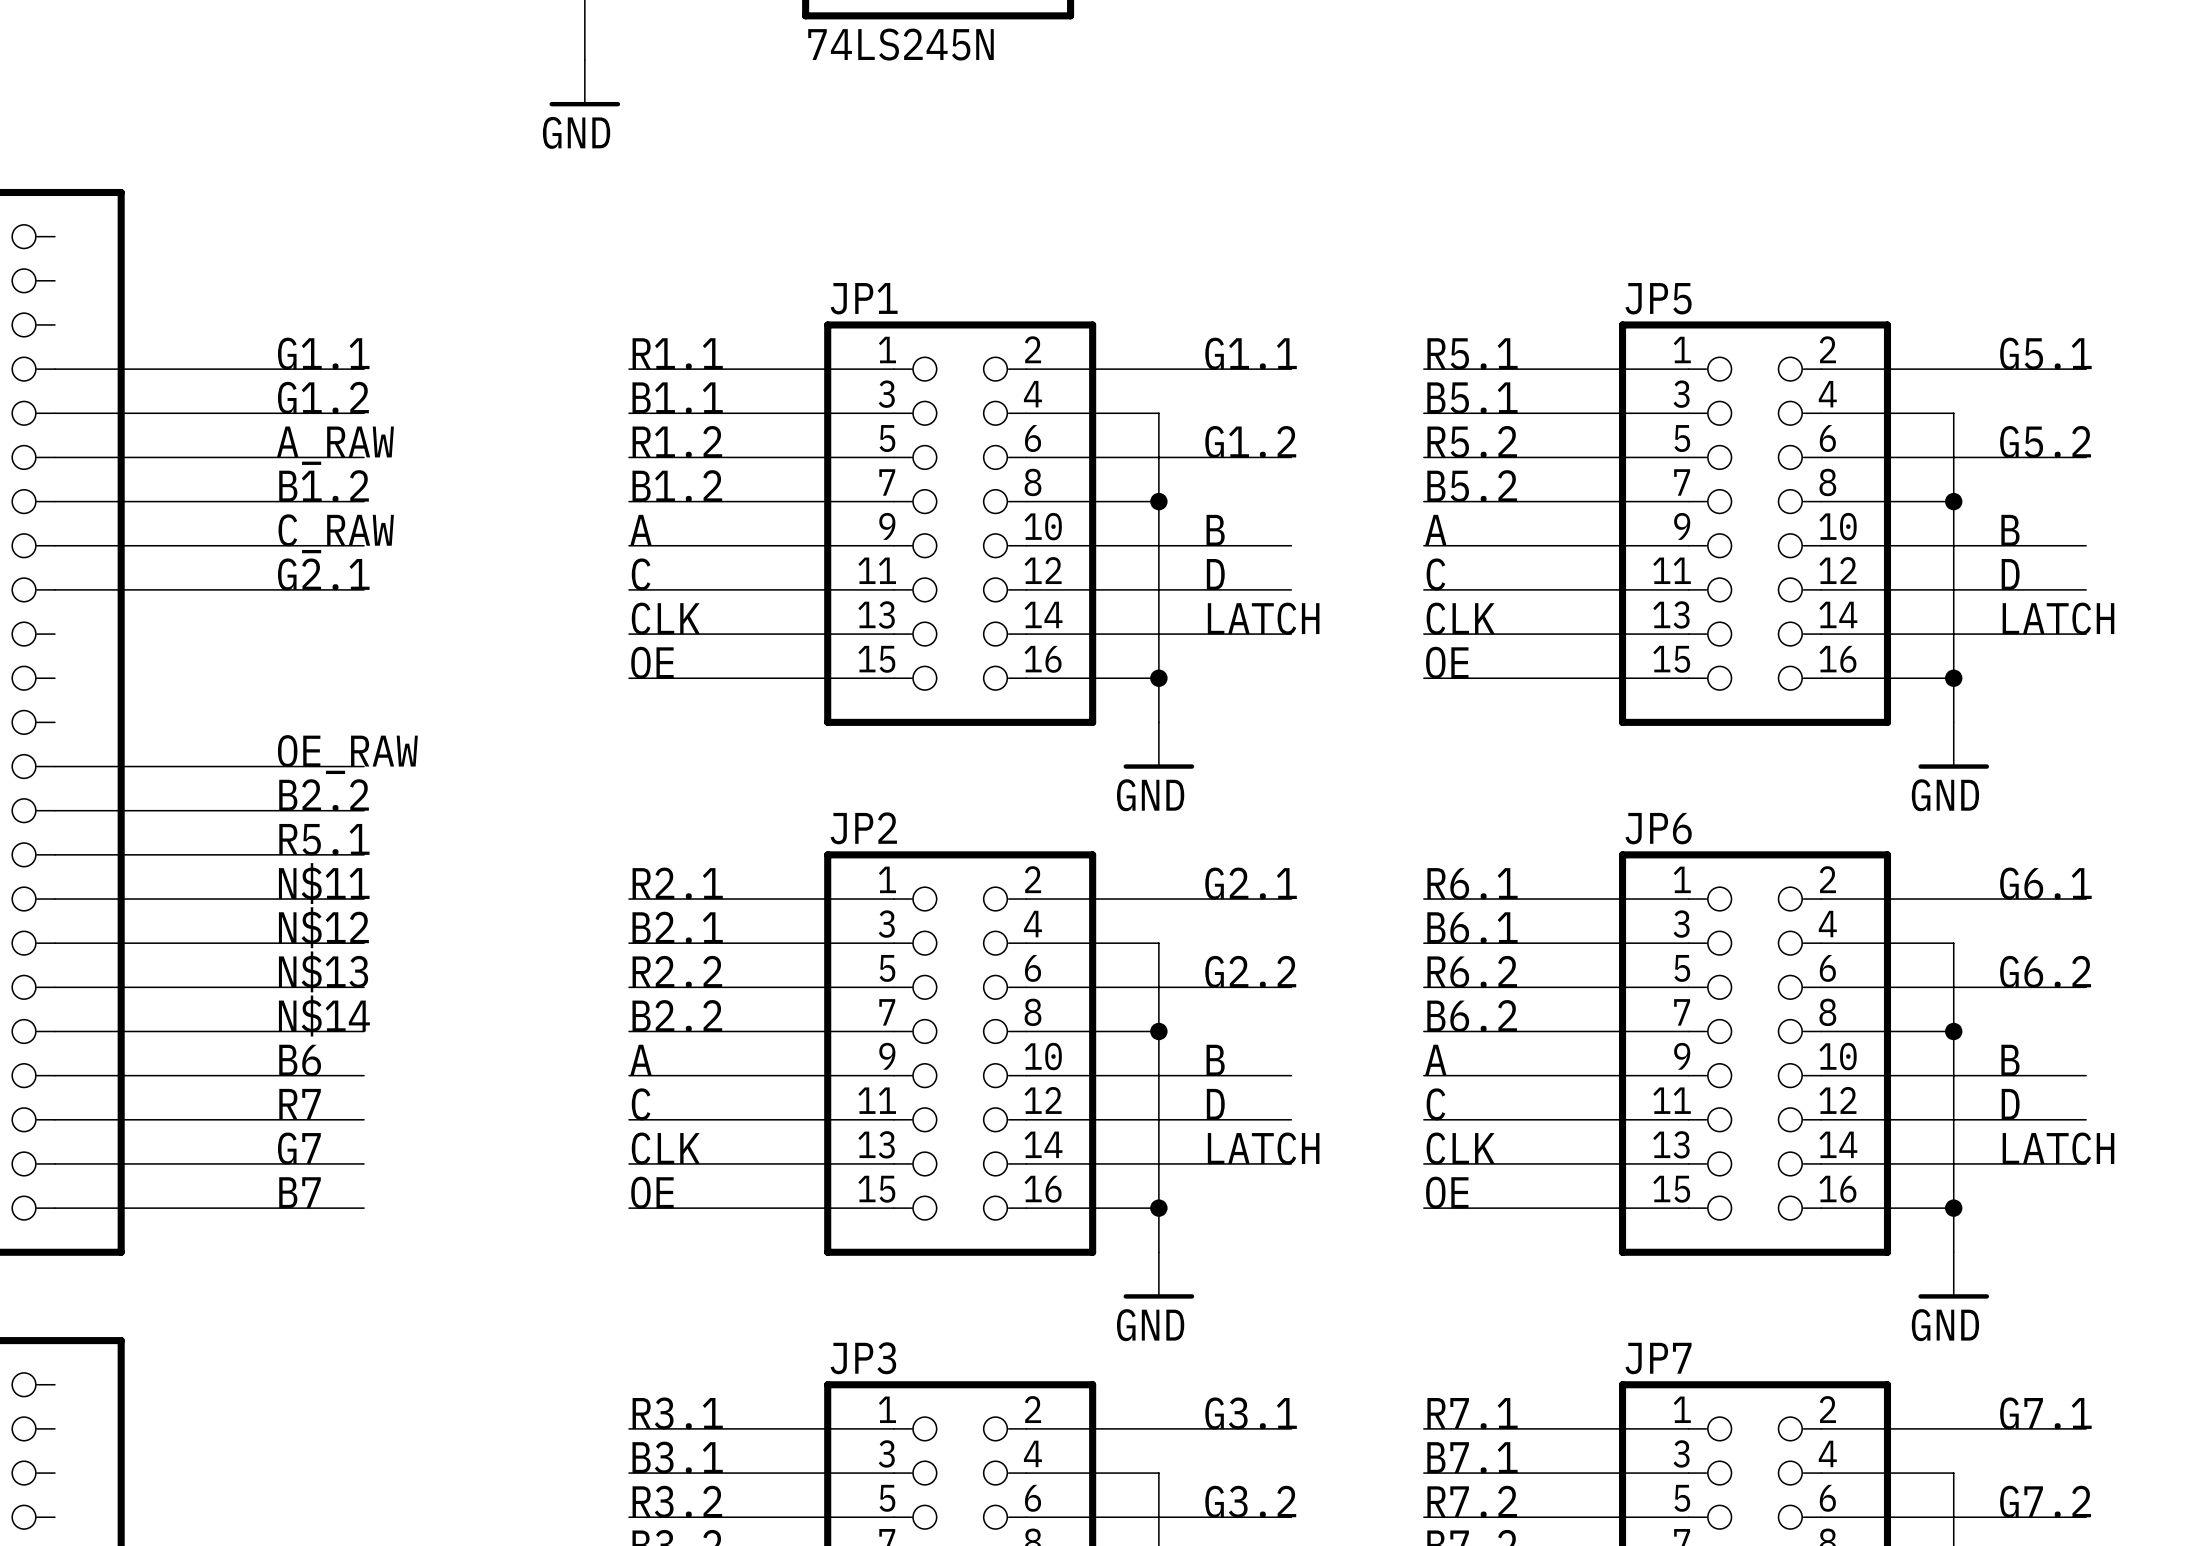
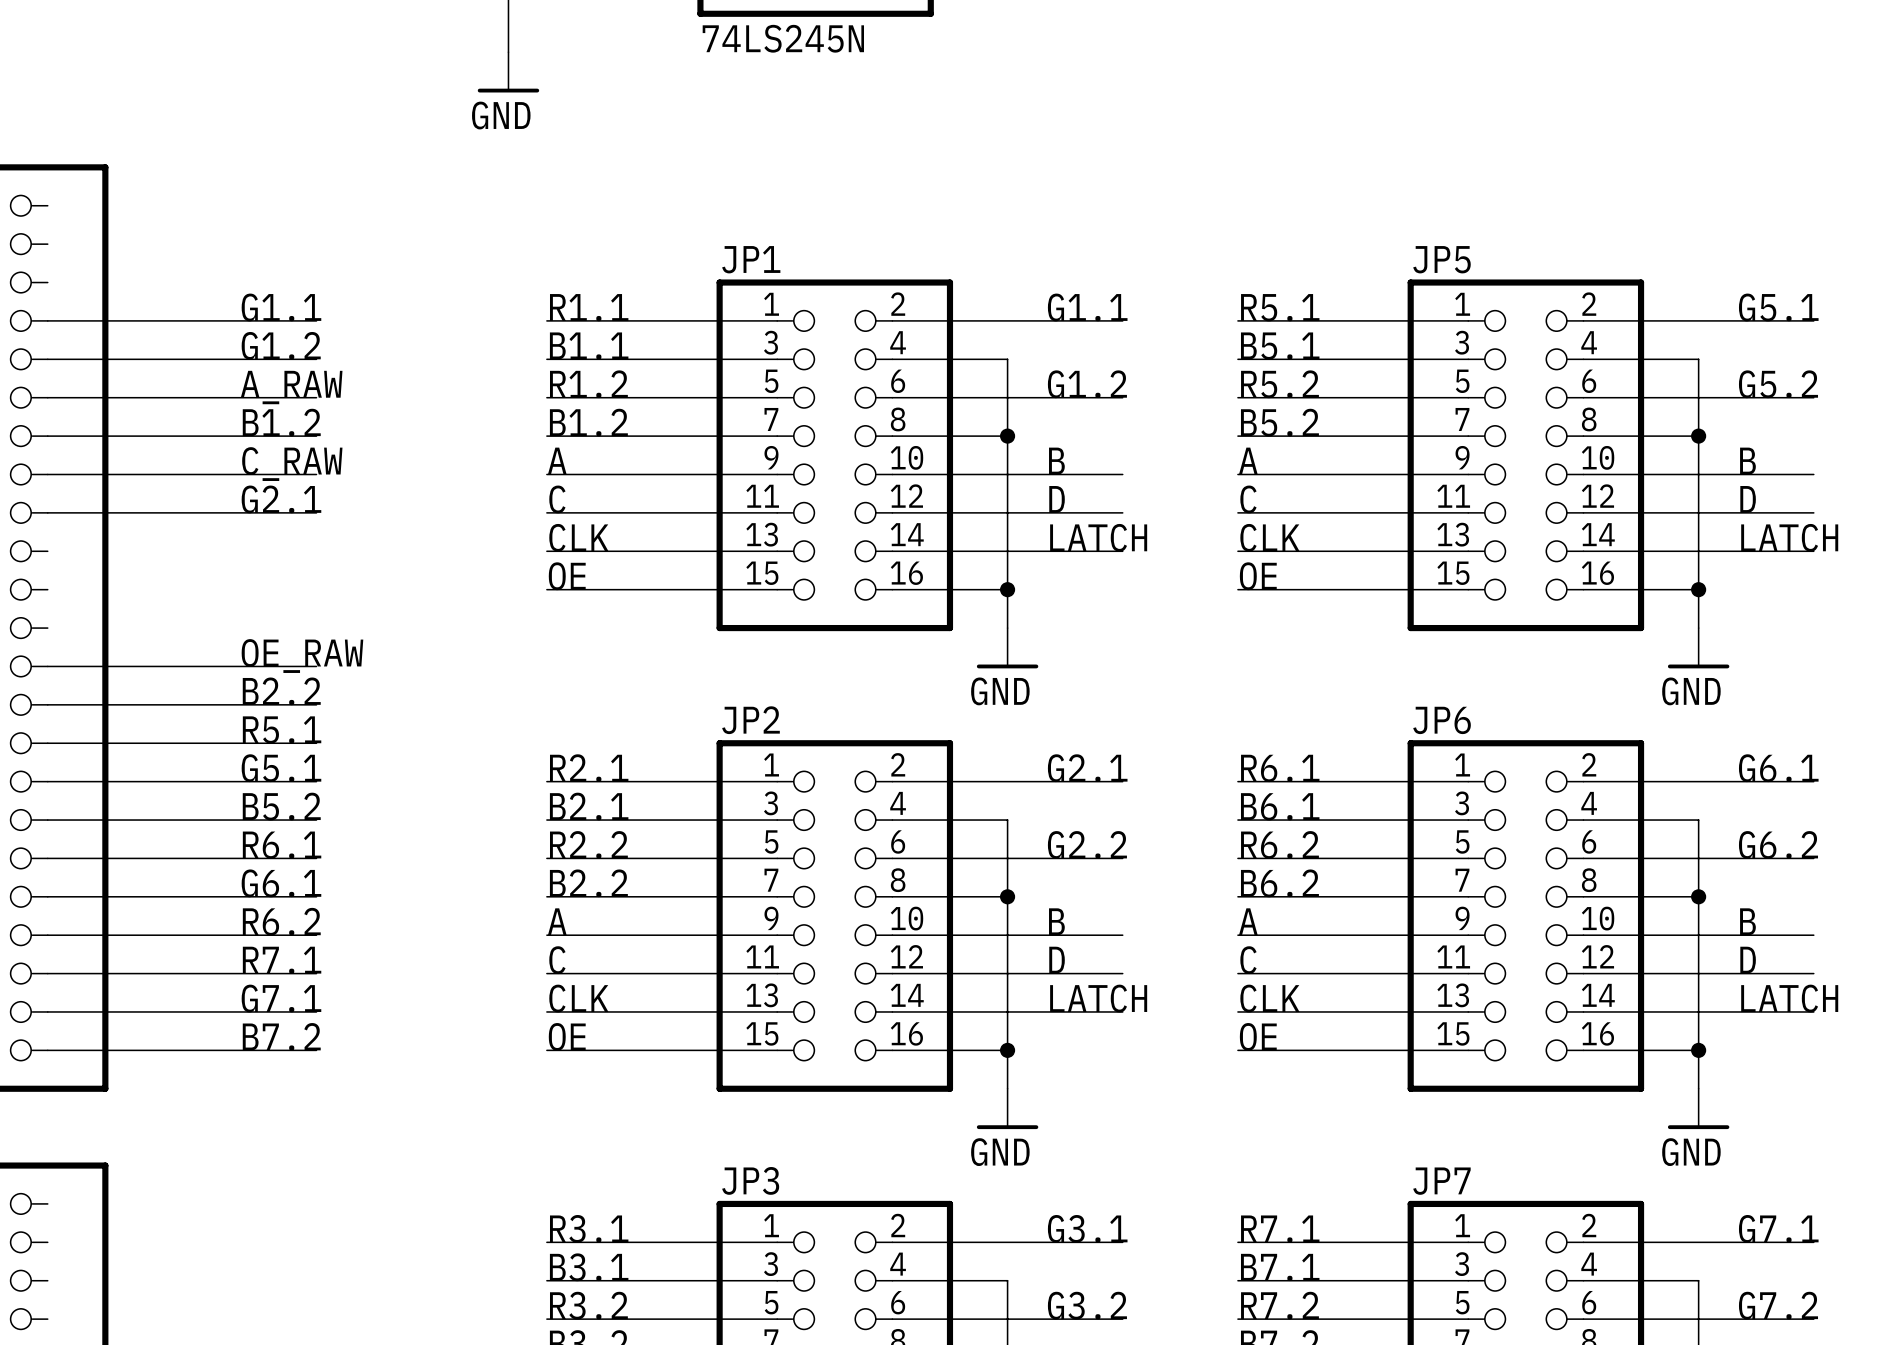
label: N$11 (324, 883) -> G5.1 (281, 768)
label: N$12 (323, 927) -> B5.2 (281, 806)
label: N$13 (323, 971) -> R6.1 (282, 845)
label: N$14 (324, 1016) -> G6.1 (281, 883)
label: B6 (300, 1060) -> R6.2 (281, 921)
label: R7 (300, 1104) -> R7.1 (282, 960)
label: G7 (299, 1148) -> G7.1 (281, 998)
label: B7 (300, 1192) -> B7.2 (281, 1036)

